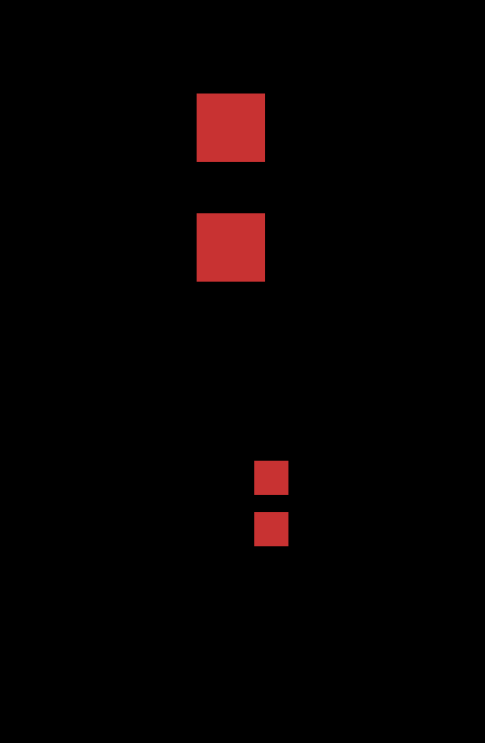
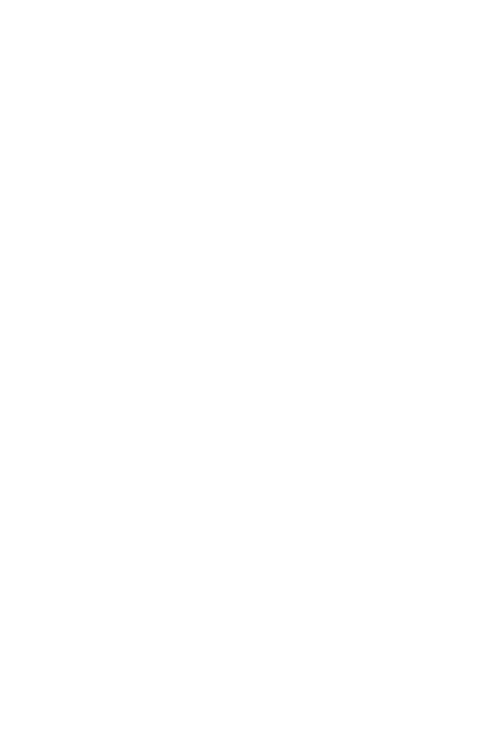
part: (230, 187) -> none
part: (271, 503) -> none

